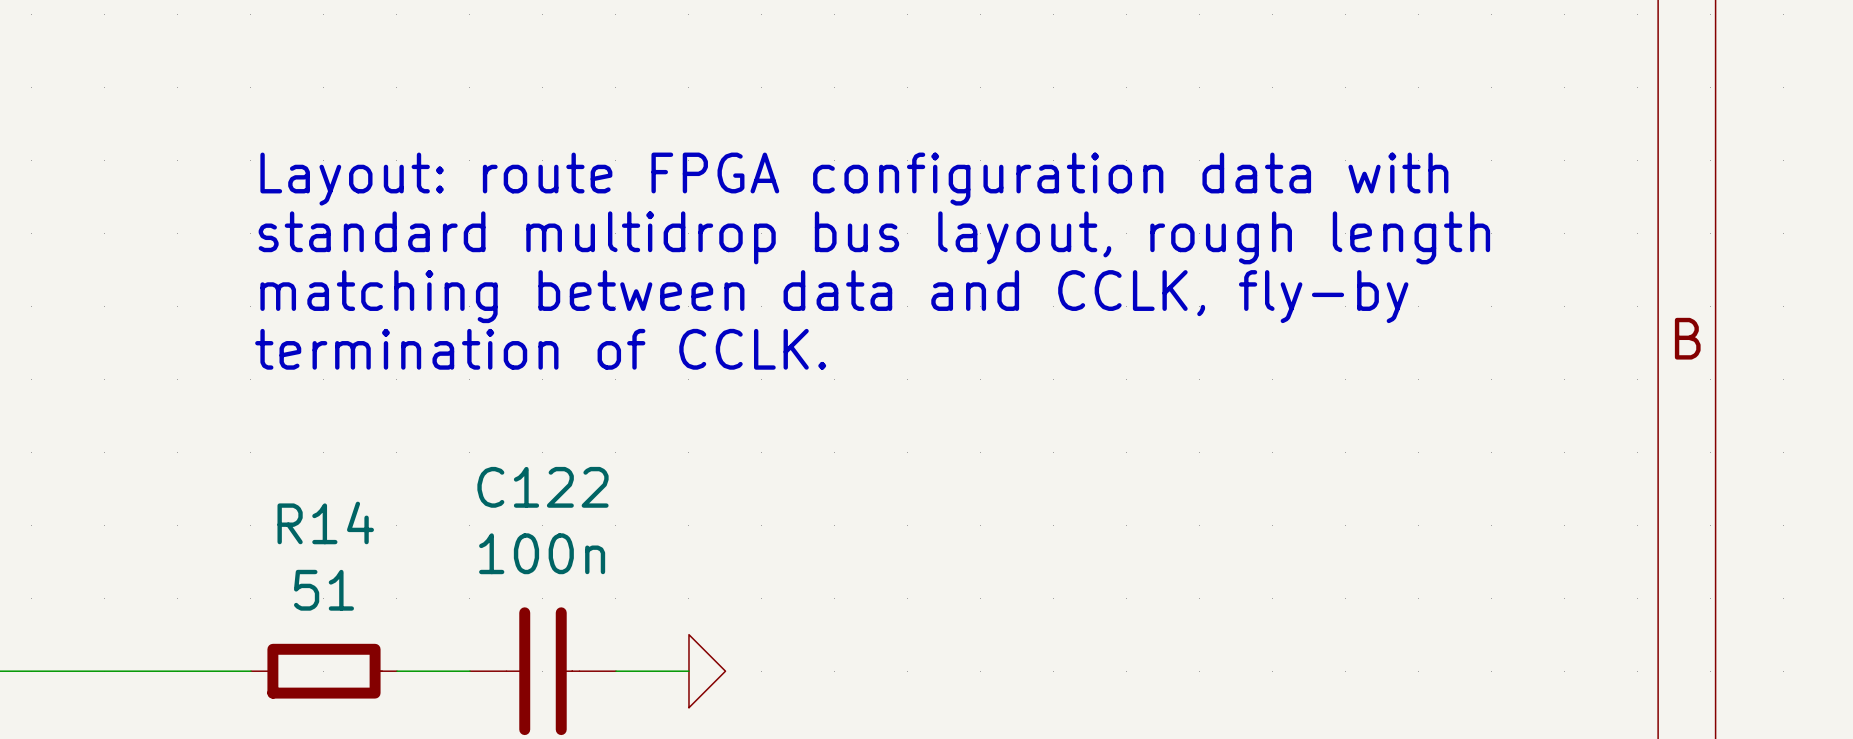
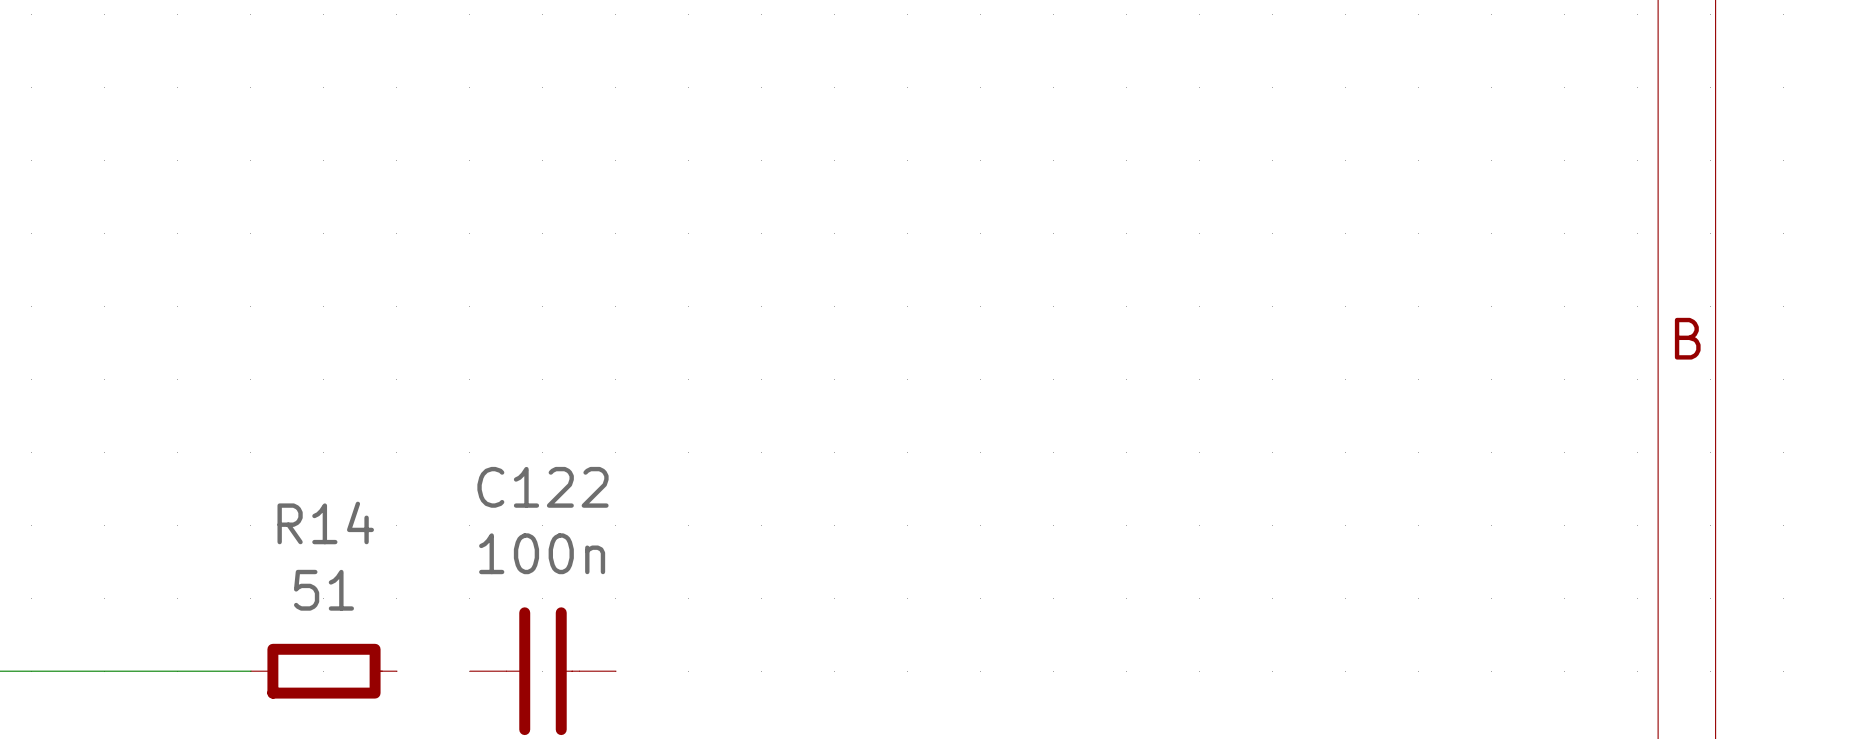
text: Layout: route FPGA configuration data with (854, 179) -> none
text: standard multidrop bus layout, rough length (874, 237) -> none
text: matching between data and CCLK, fly-by (834, 296) -> none
text: termination of CCLK. (540, 349) -> none
wire: (396, 671) (469, 671) -> none
wire: (615, 671) (688, 671) -> none
power symbol: (707, 671) -> none

